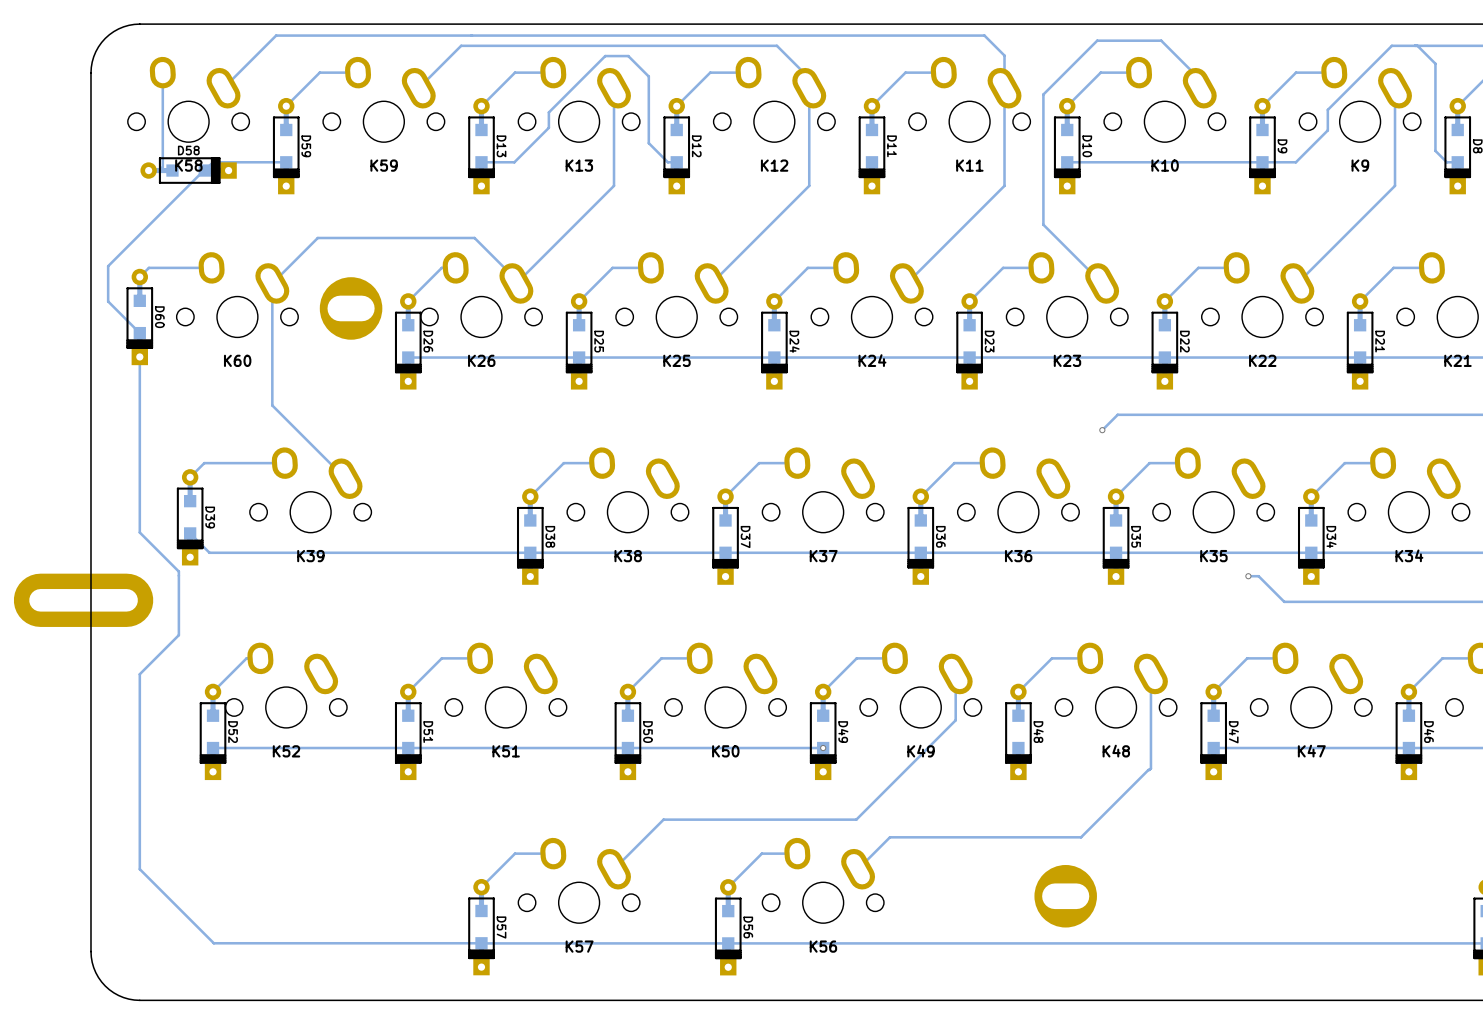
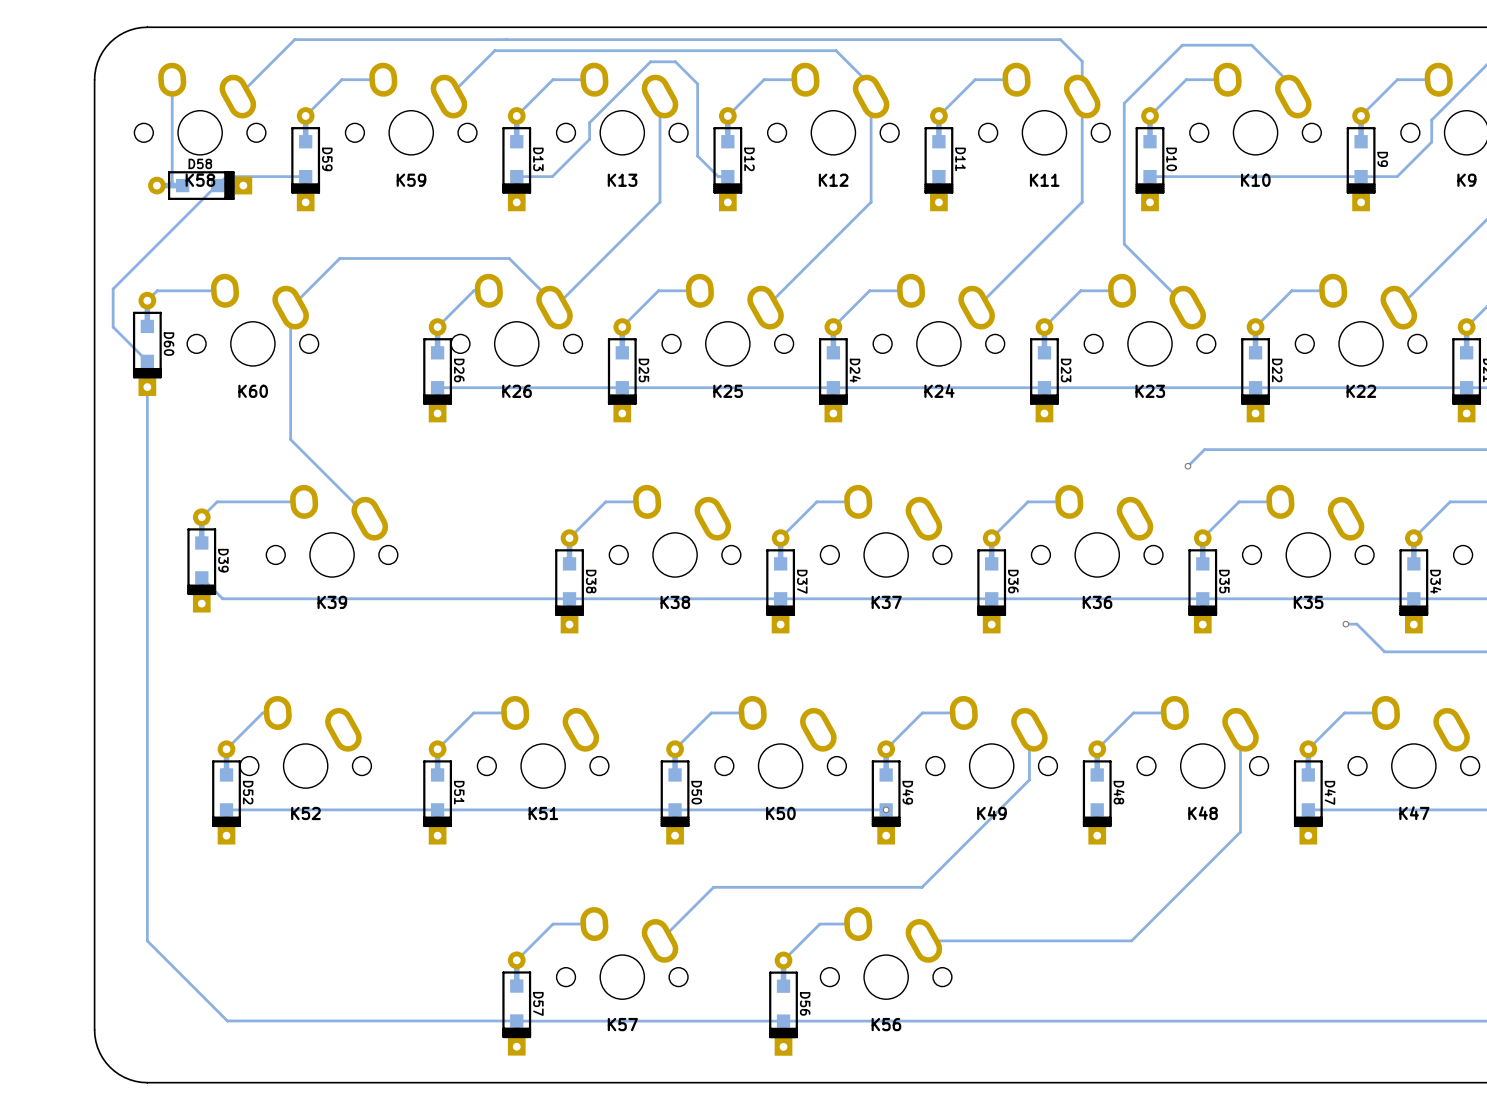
part: (351, 308) -> none
track: (139, 532) (178, 571) (178, 635) (139, 674) -> (147, 576) (147, 730)
part: (83, 600) -> none
track: (1149, 769) (1081, 837) (889, 837) (858, 869) -> (1238, 833) (1131, 940) (923, 940)
part: (1065, 896) -> none

